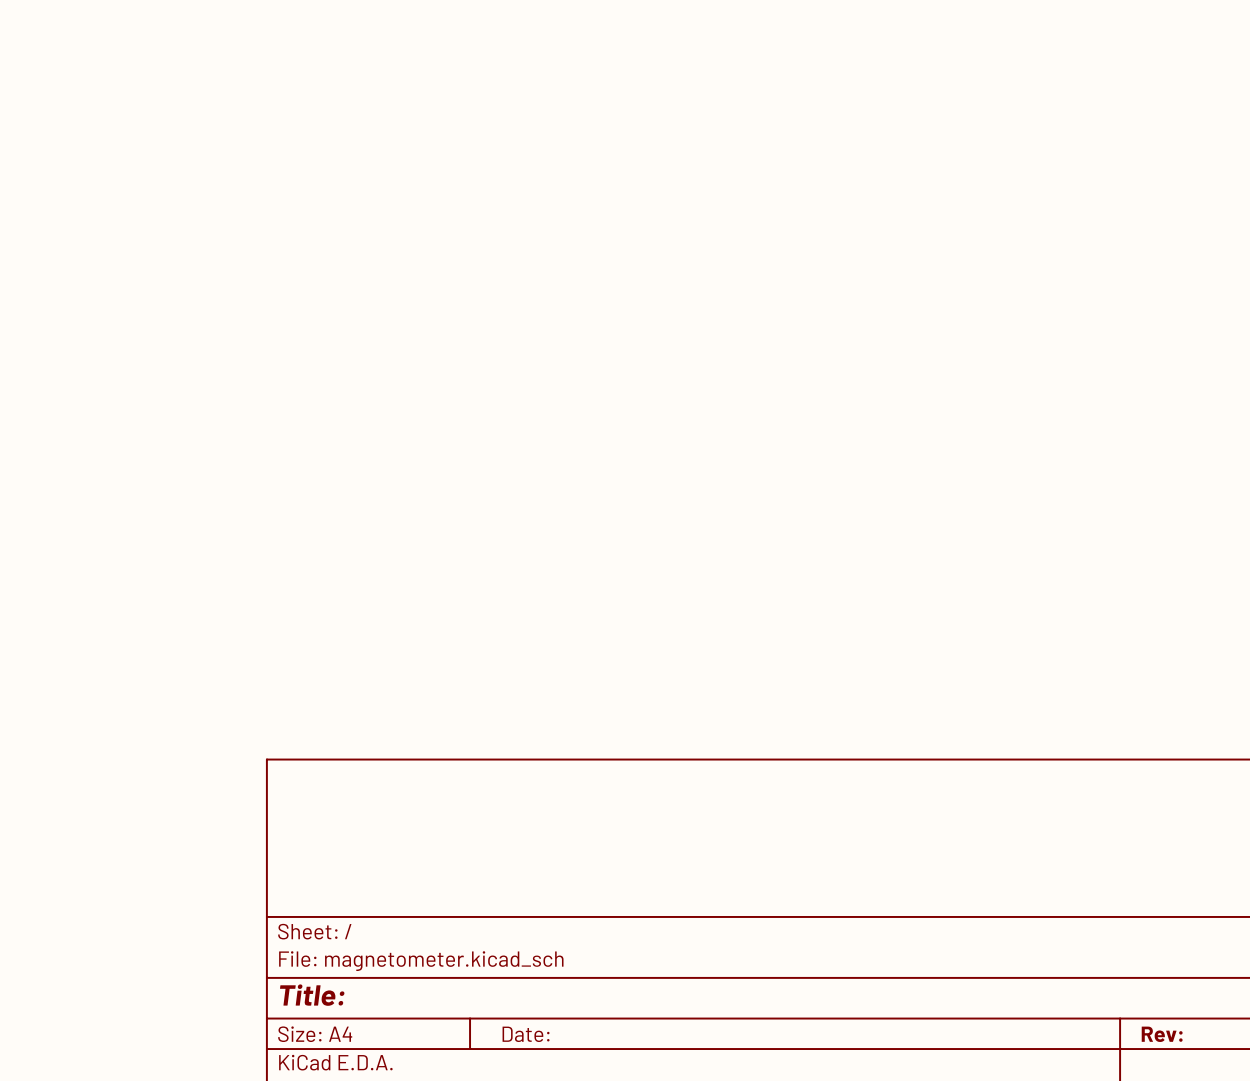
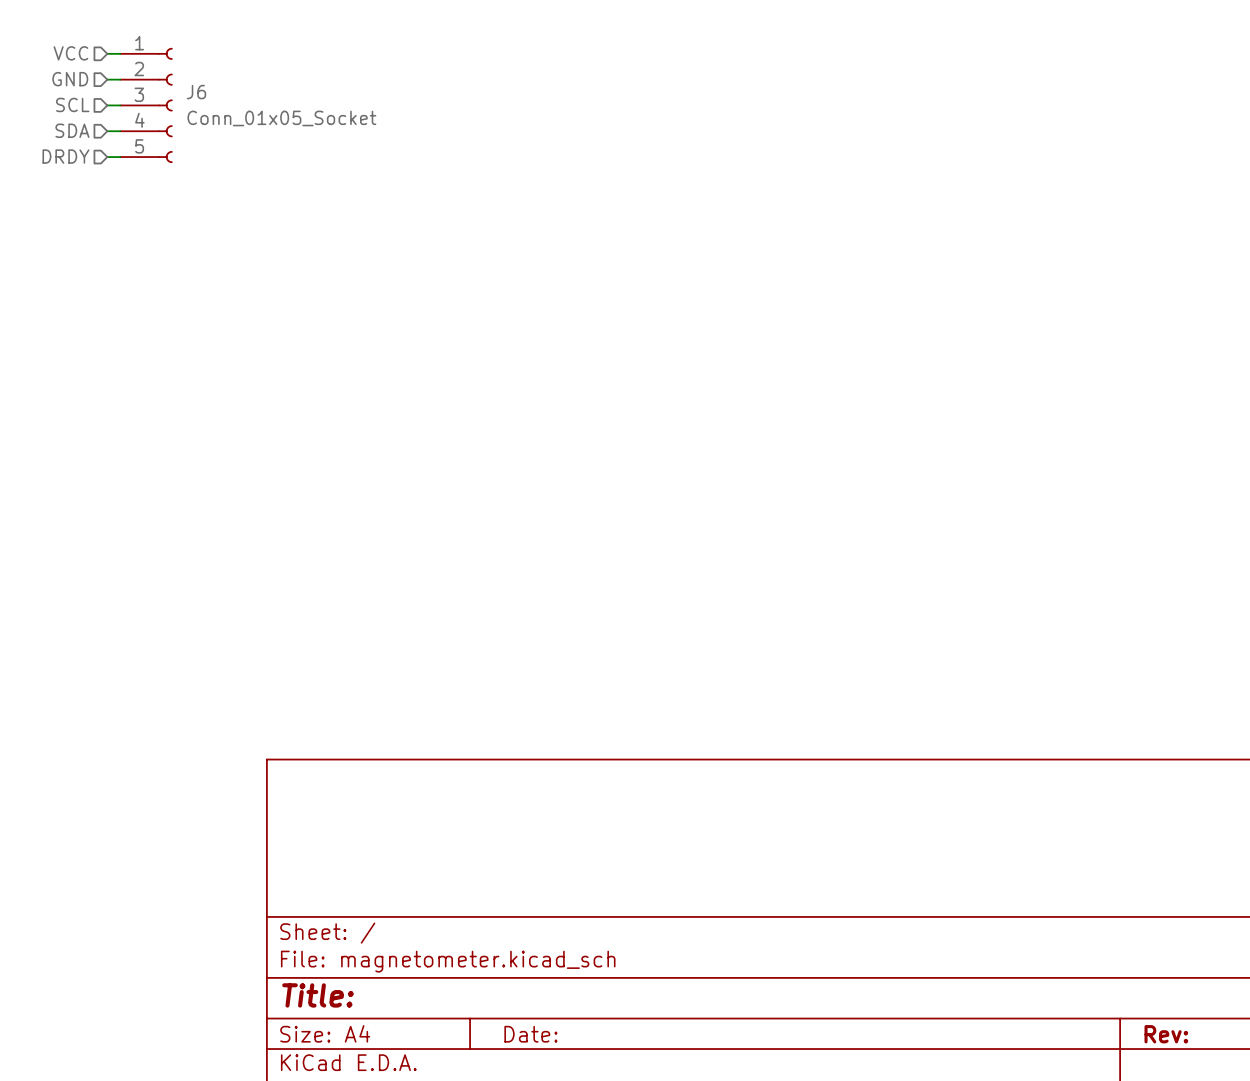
hierarchical label: none -> VCC (70, 53)
wire: none -> (107, 53) (120, 53)
hierarchical label: none -> GND (70, 79)
wire: none -> (107, 79) (120, 79)
hierarchical label: none -> SCL (72, 104)
wire: none -> (107, 105) (120, 105)
J6: none -> Conn_01x05_Socket (146, 105)
hierarchical label: none -> SDA (72, 130)
wire: none -> (107, 131) (120, 131)
hierarchical label: none -> DRDY (65, 156)
wire: none -> (107, 157) (120, 157)

